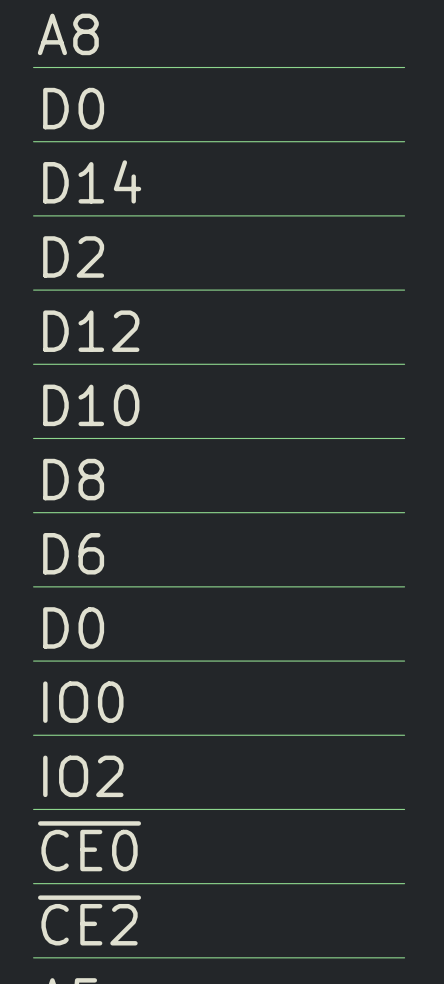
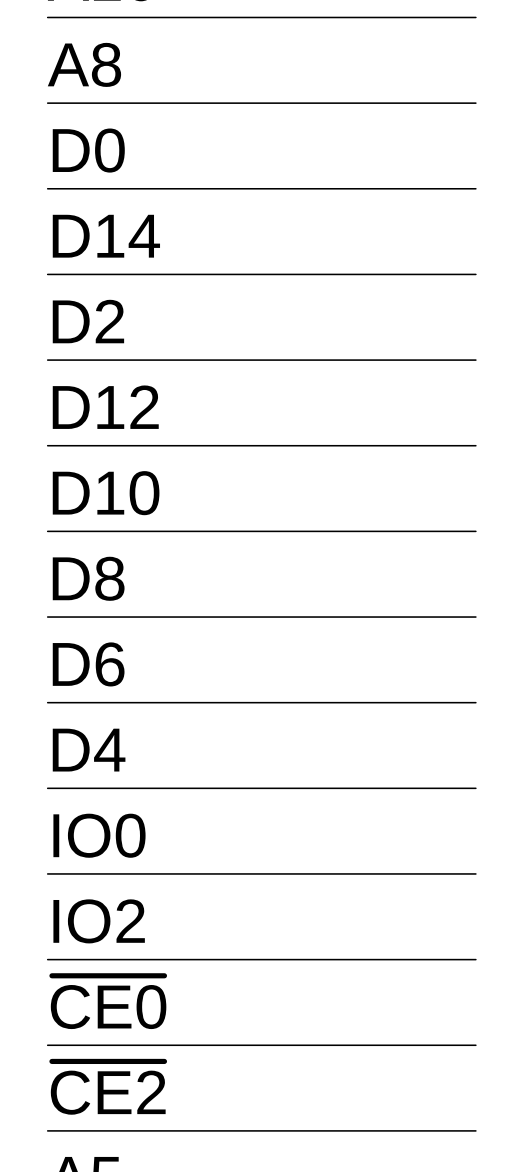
label: D0 (73, 627) -> D4 (89, 750)

